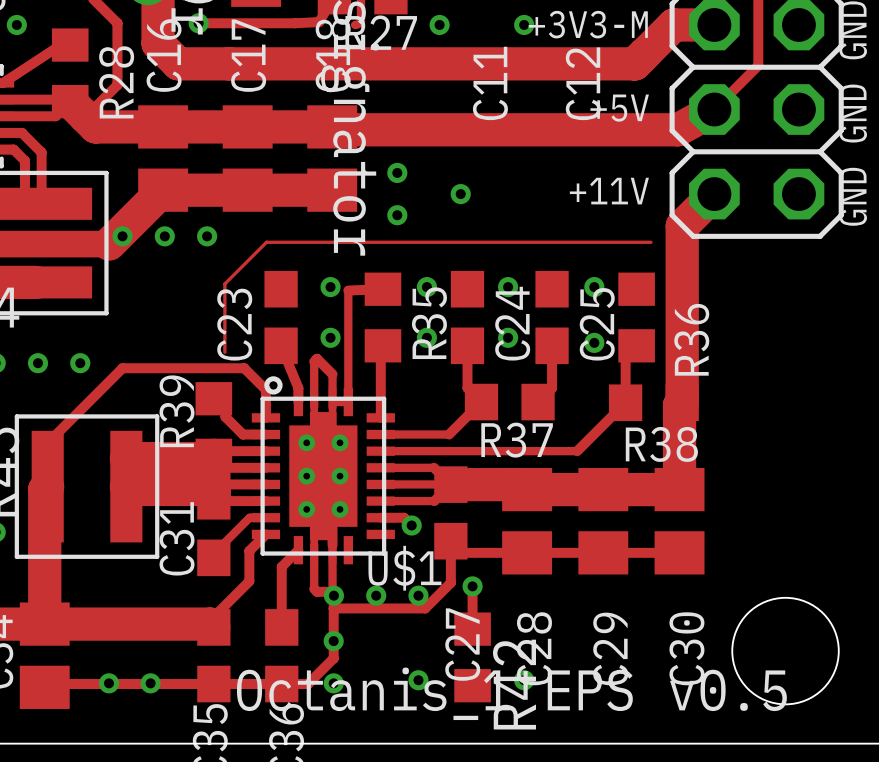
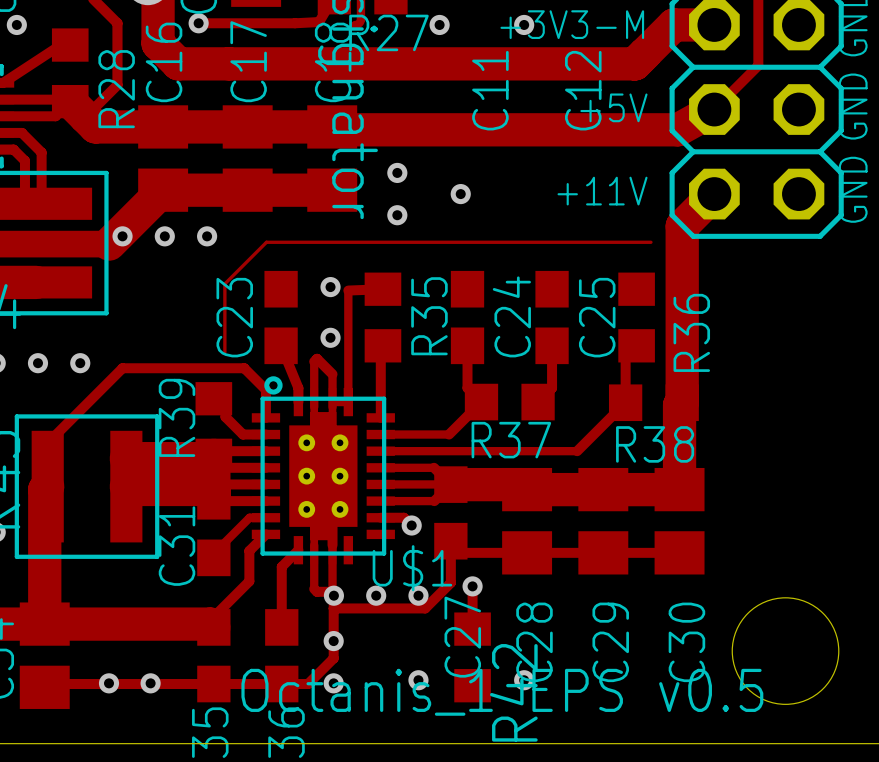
via: (426, 287) -> none
via: (508, 287) -> none
via: (594, 287) -> none
via: (426, 337) -> none
via: (508, 337) -> none
via: (594, 342) -> none

